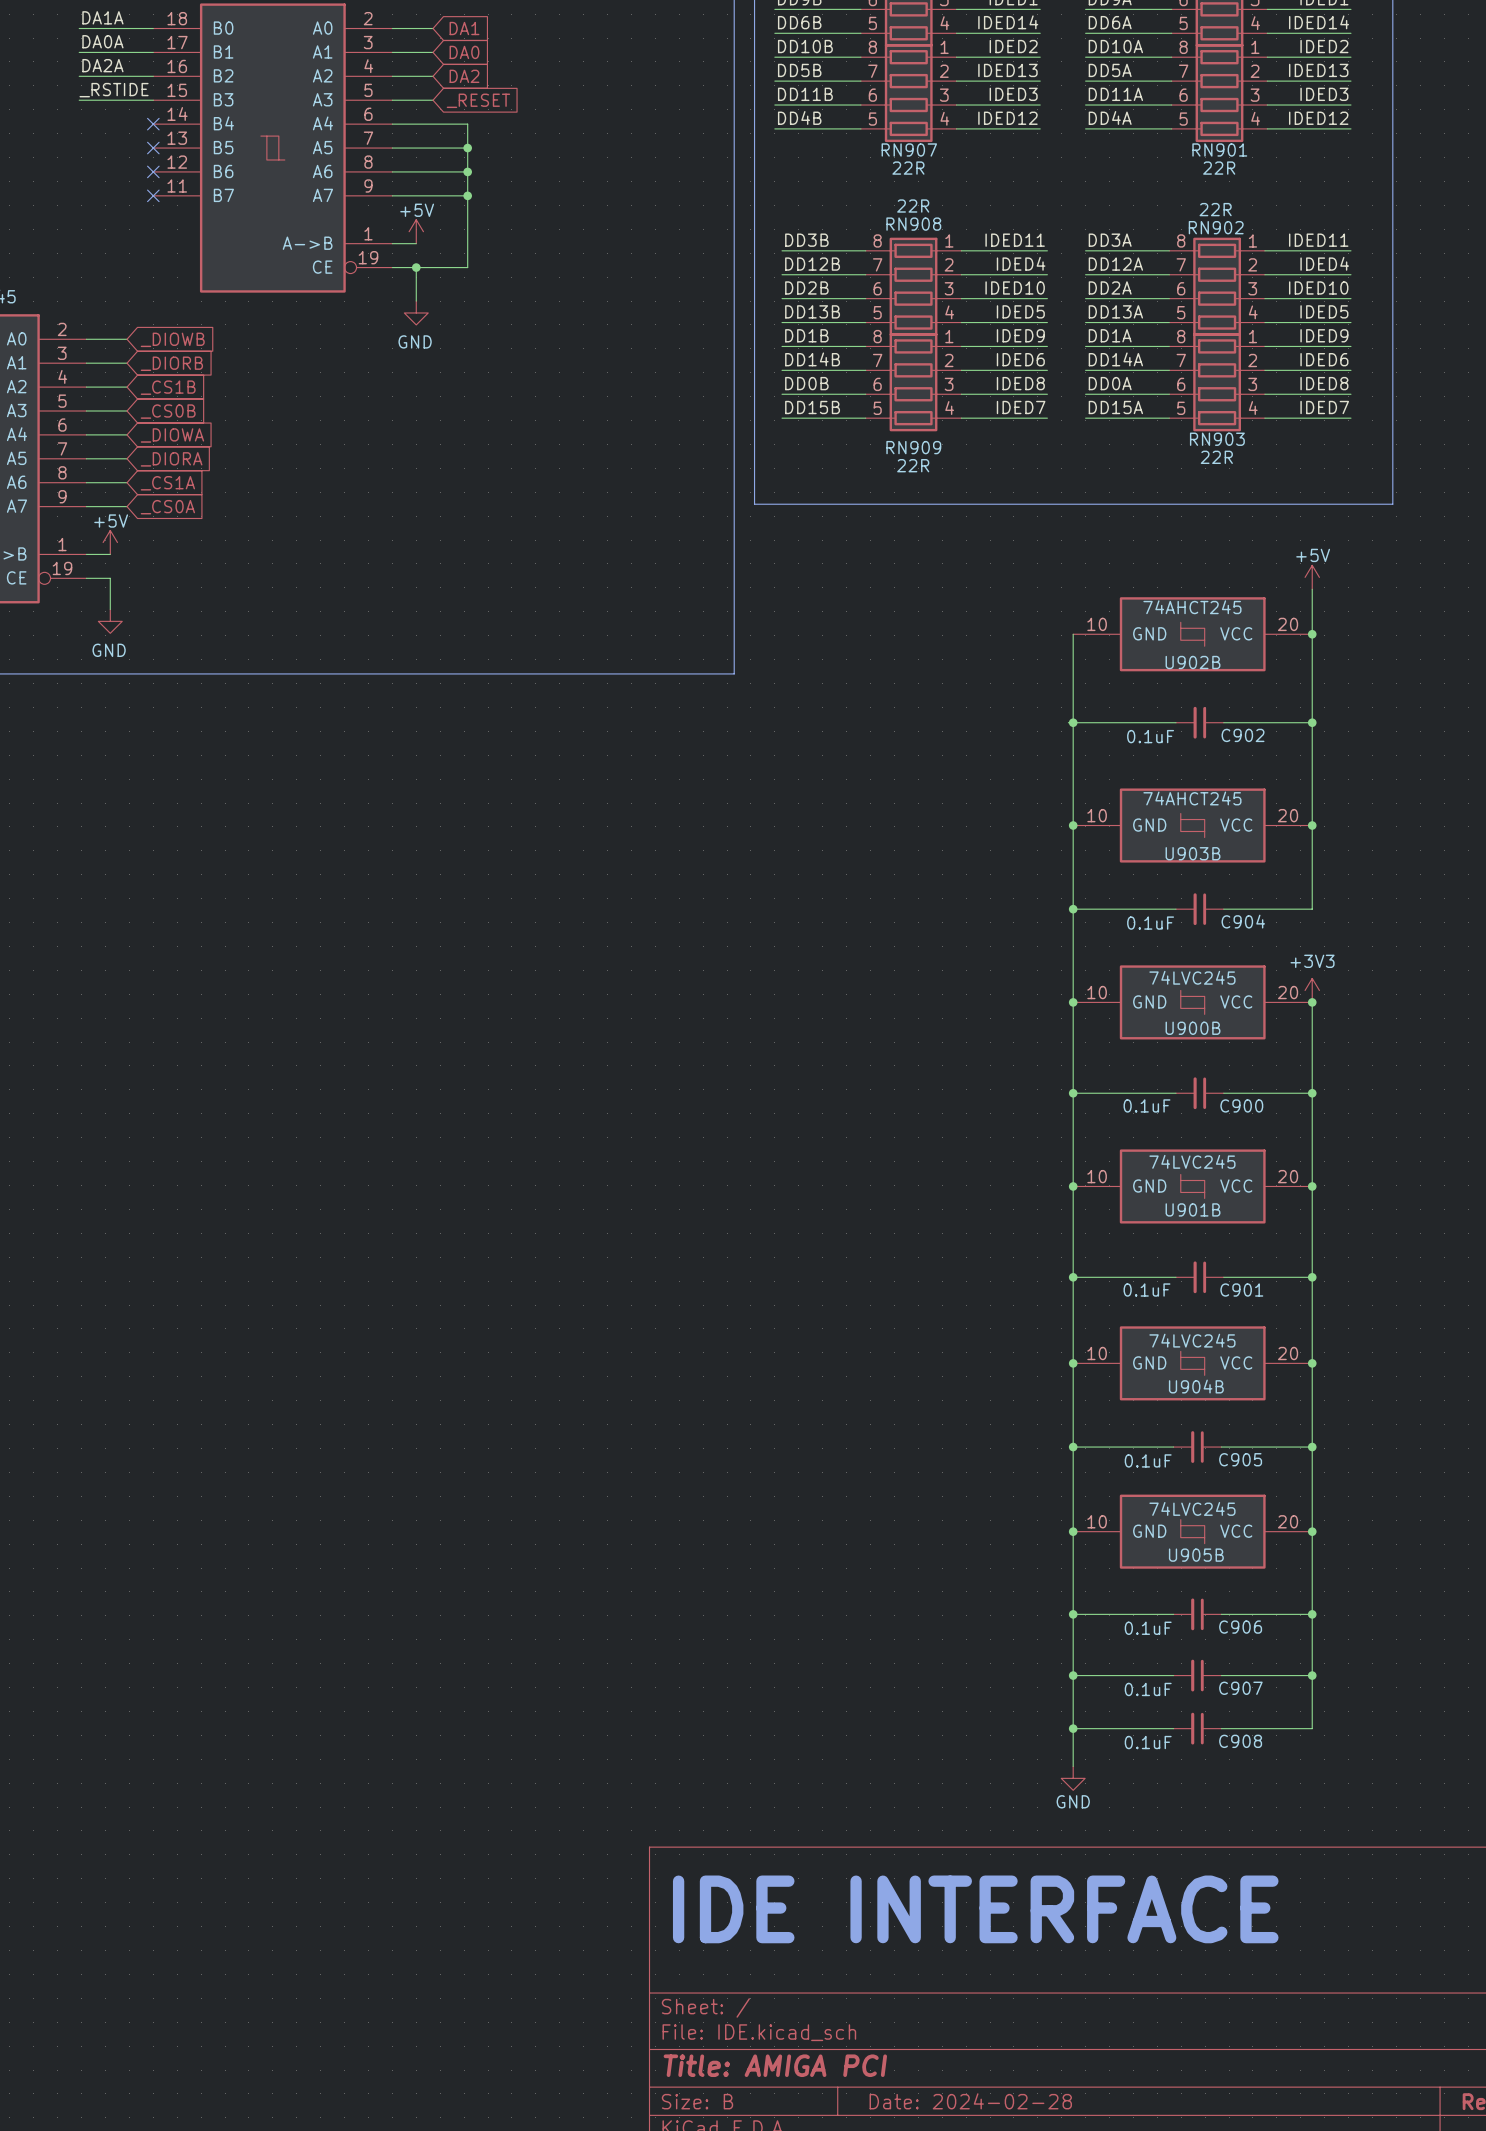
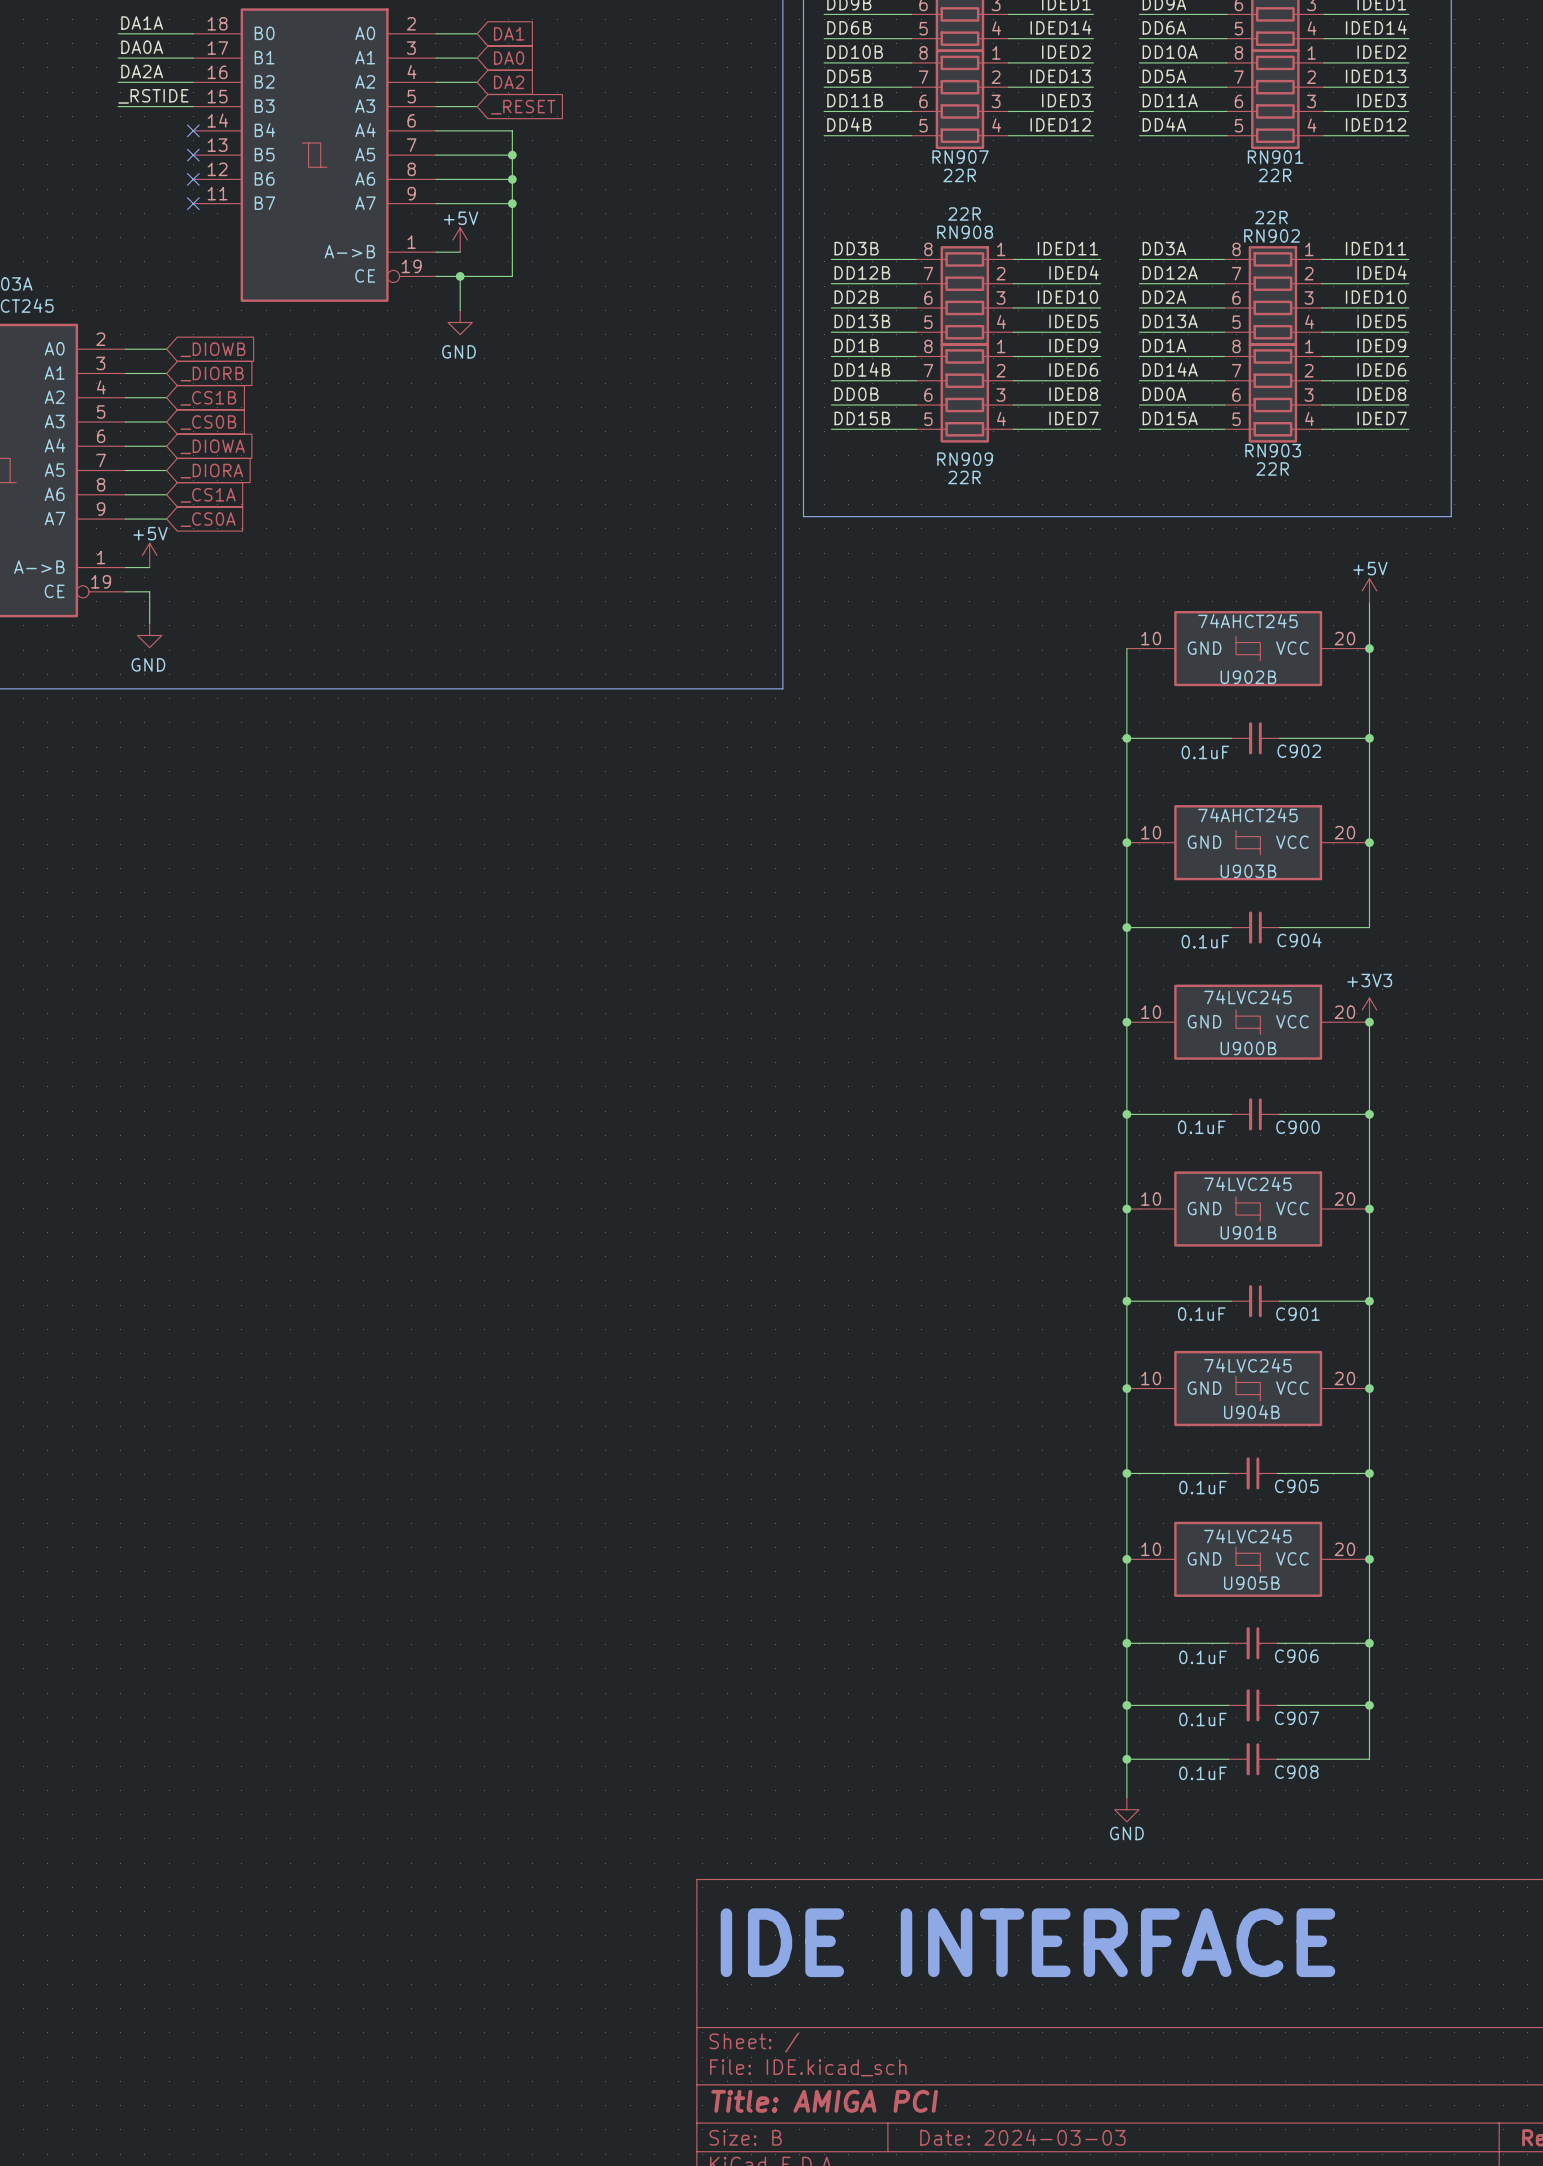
title block: Date: 2024-02-28 (970, 2101) -> Date: 2024-03-03 (1022, 2137)

